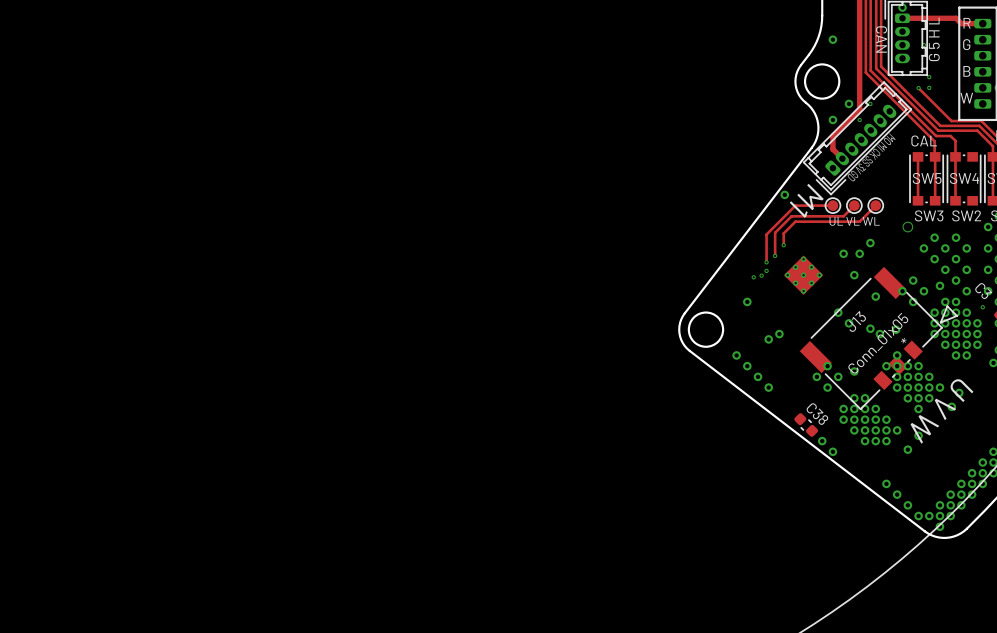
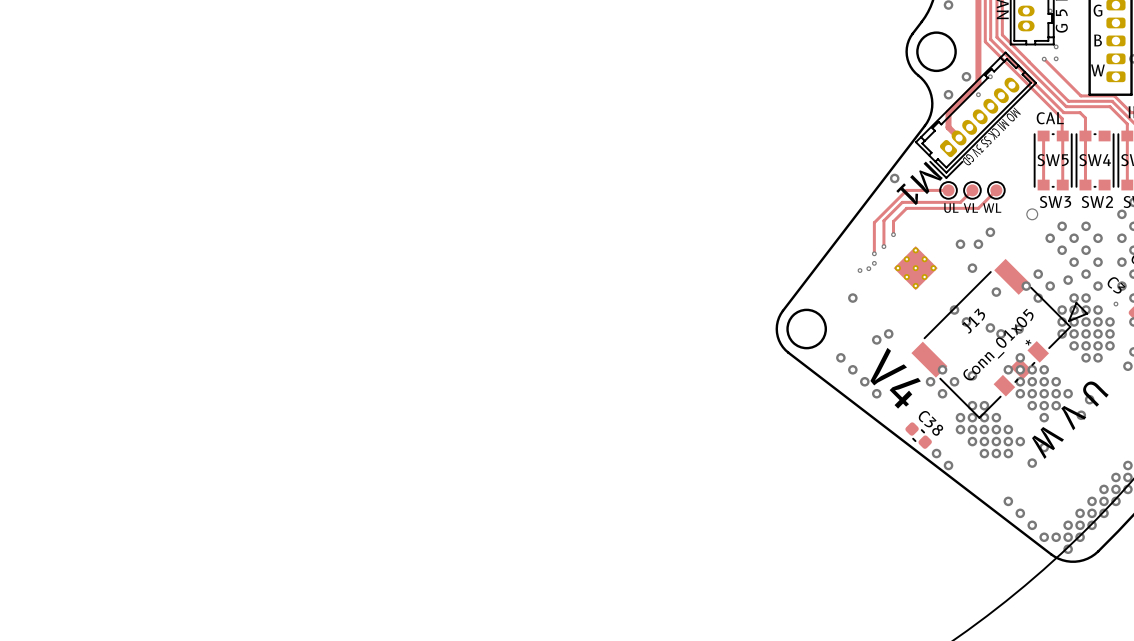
text: none -> V4 (895, 378)

